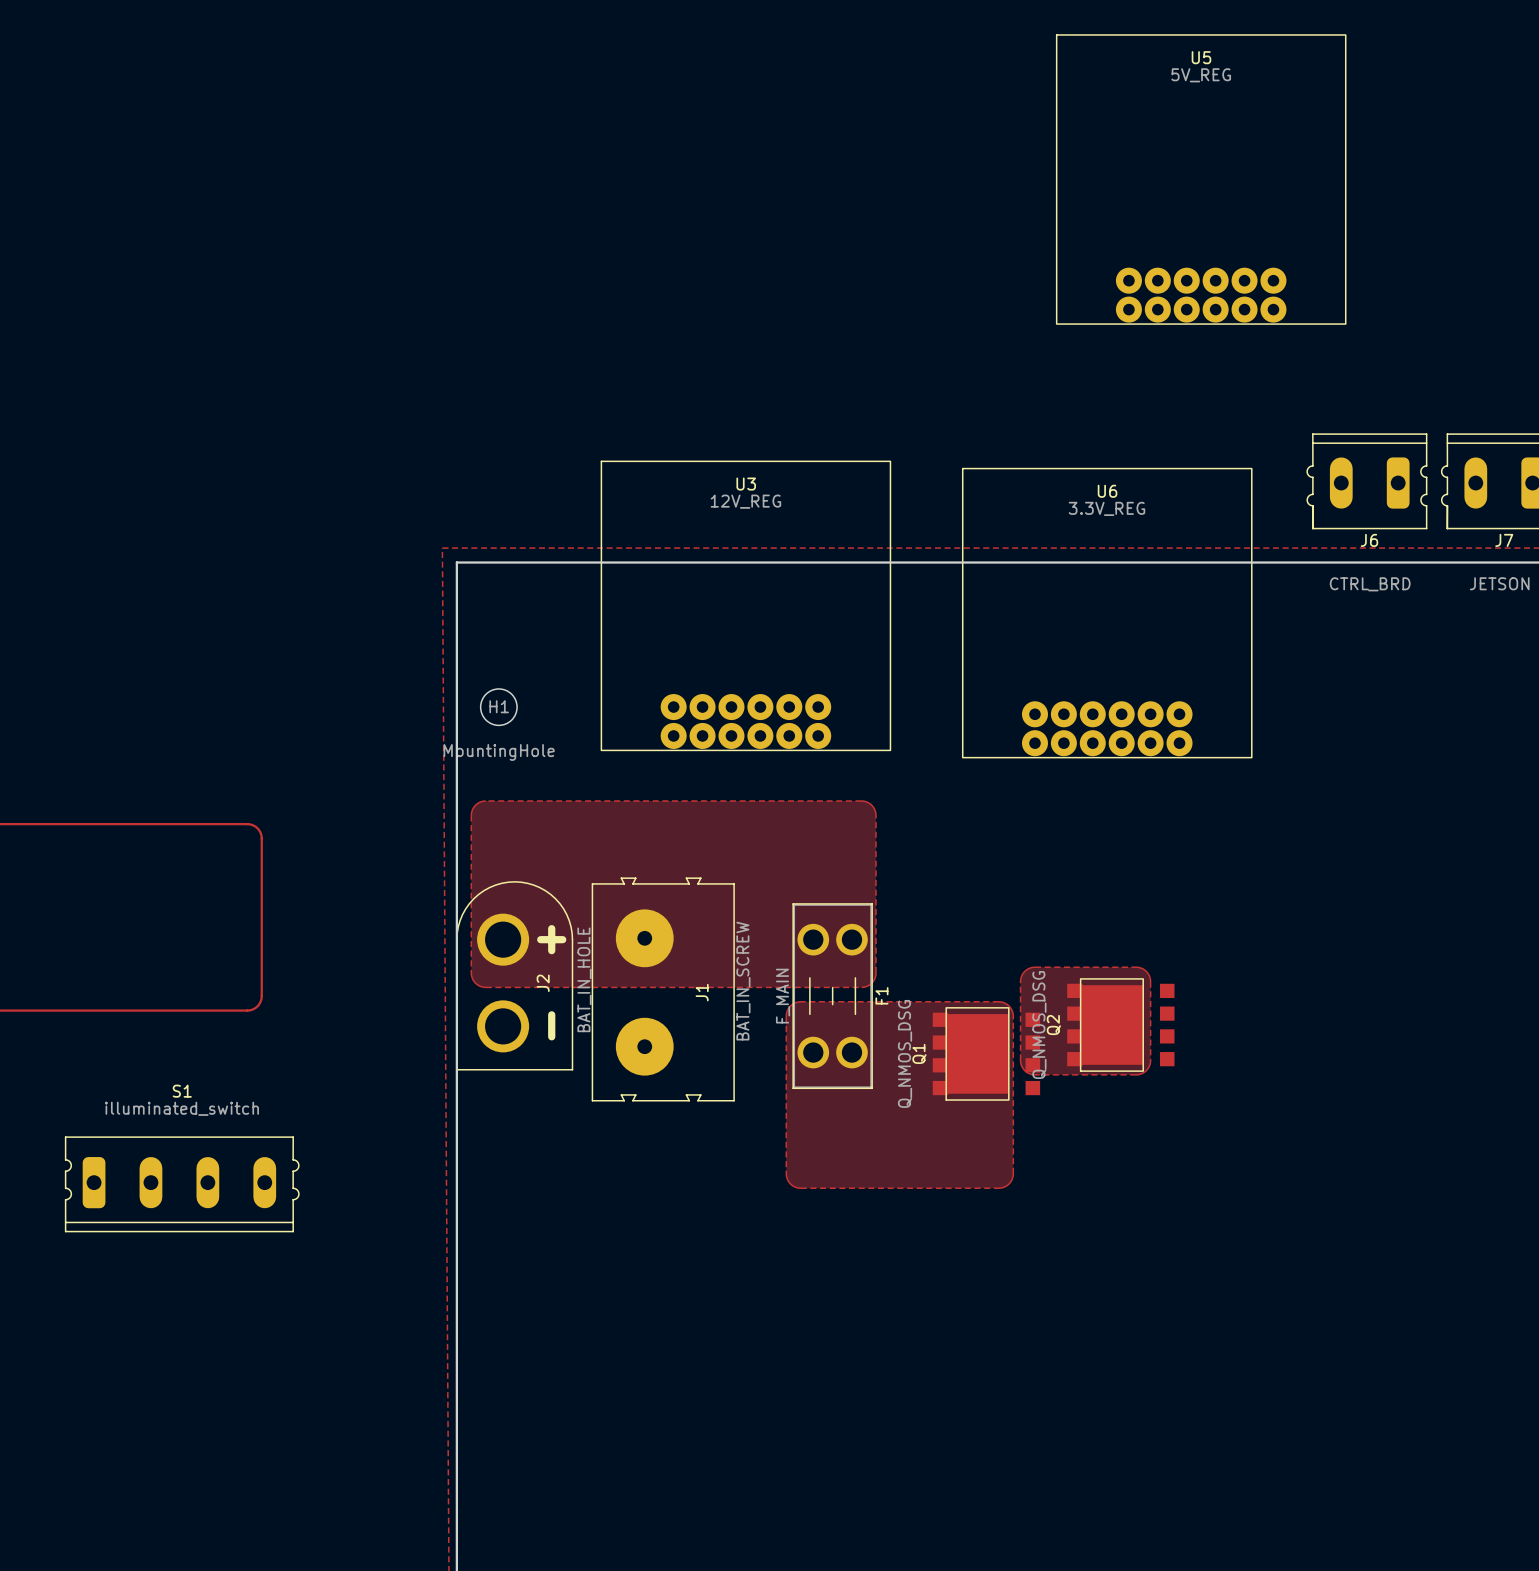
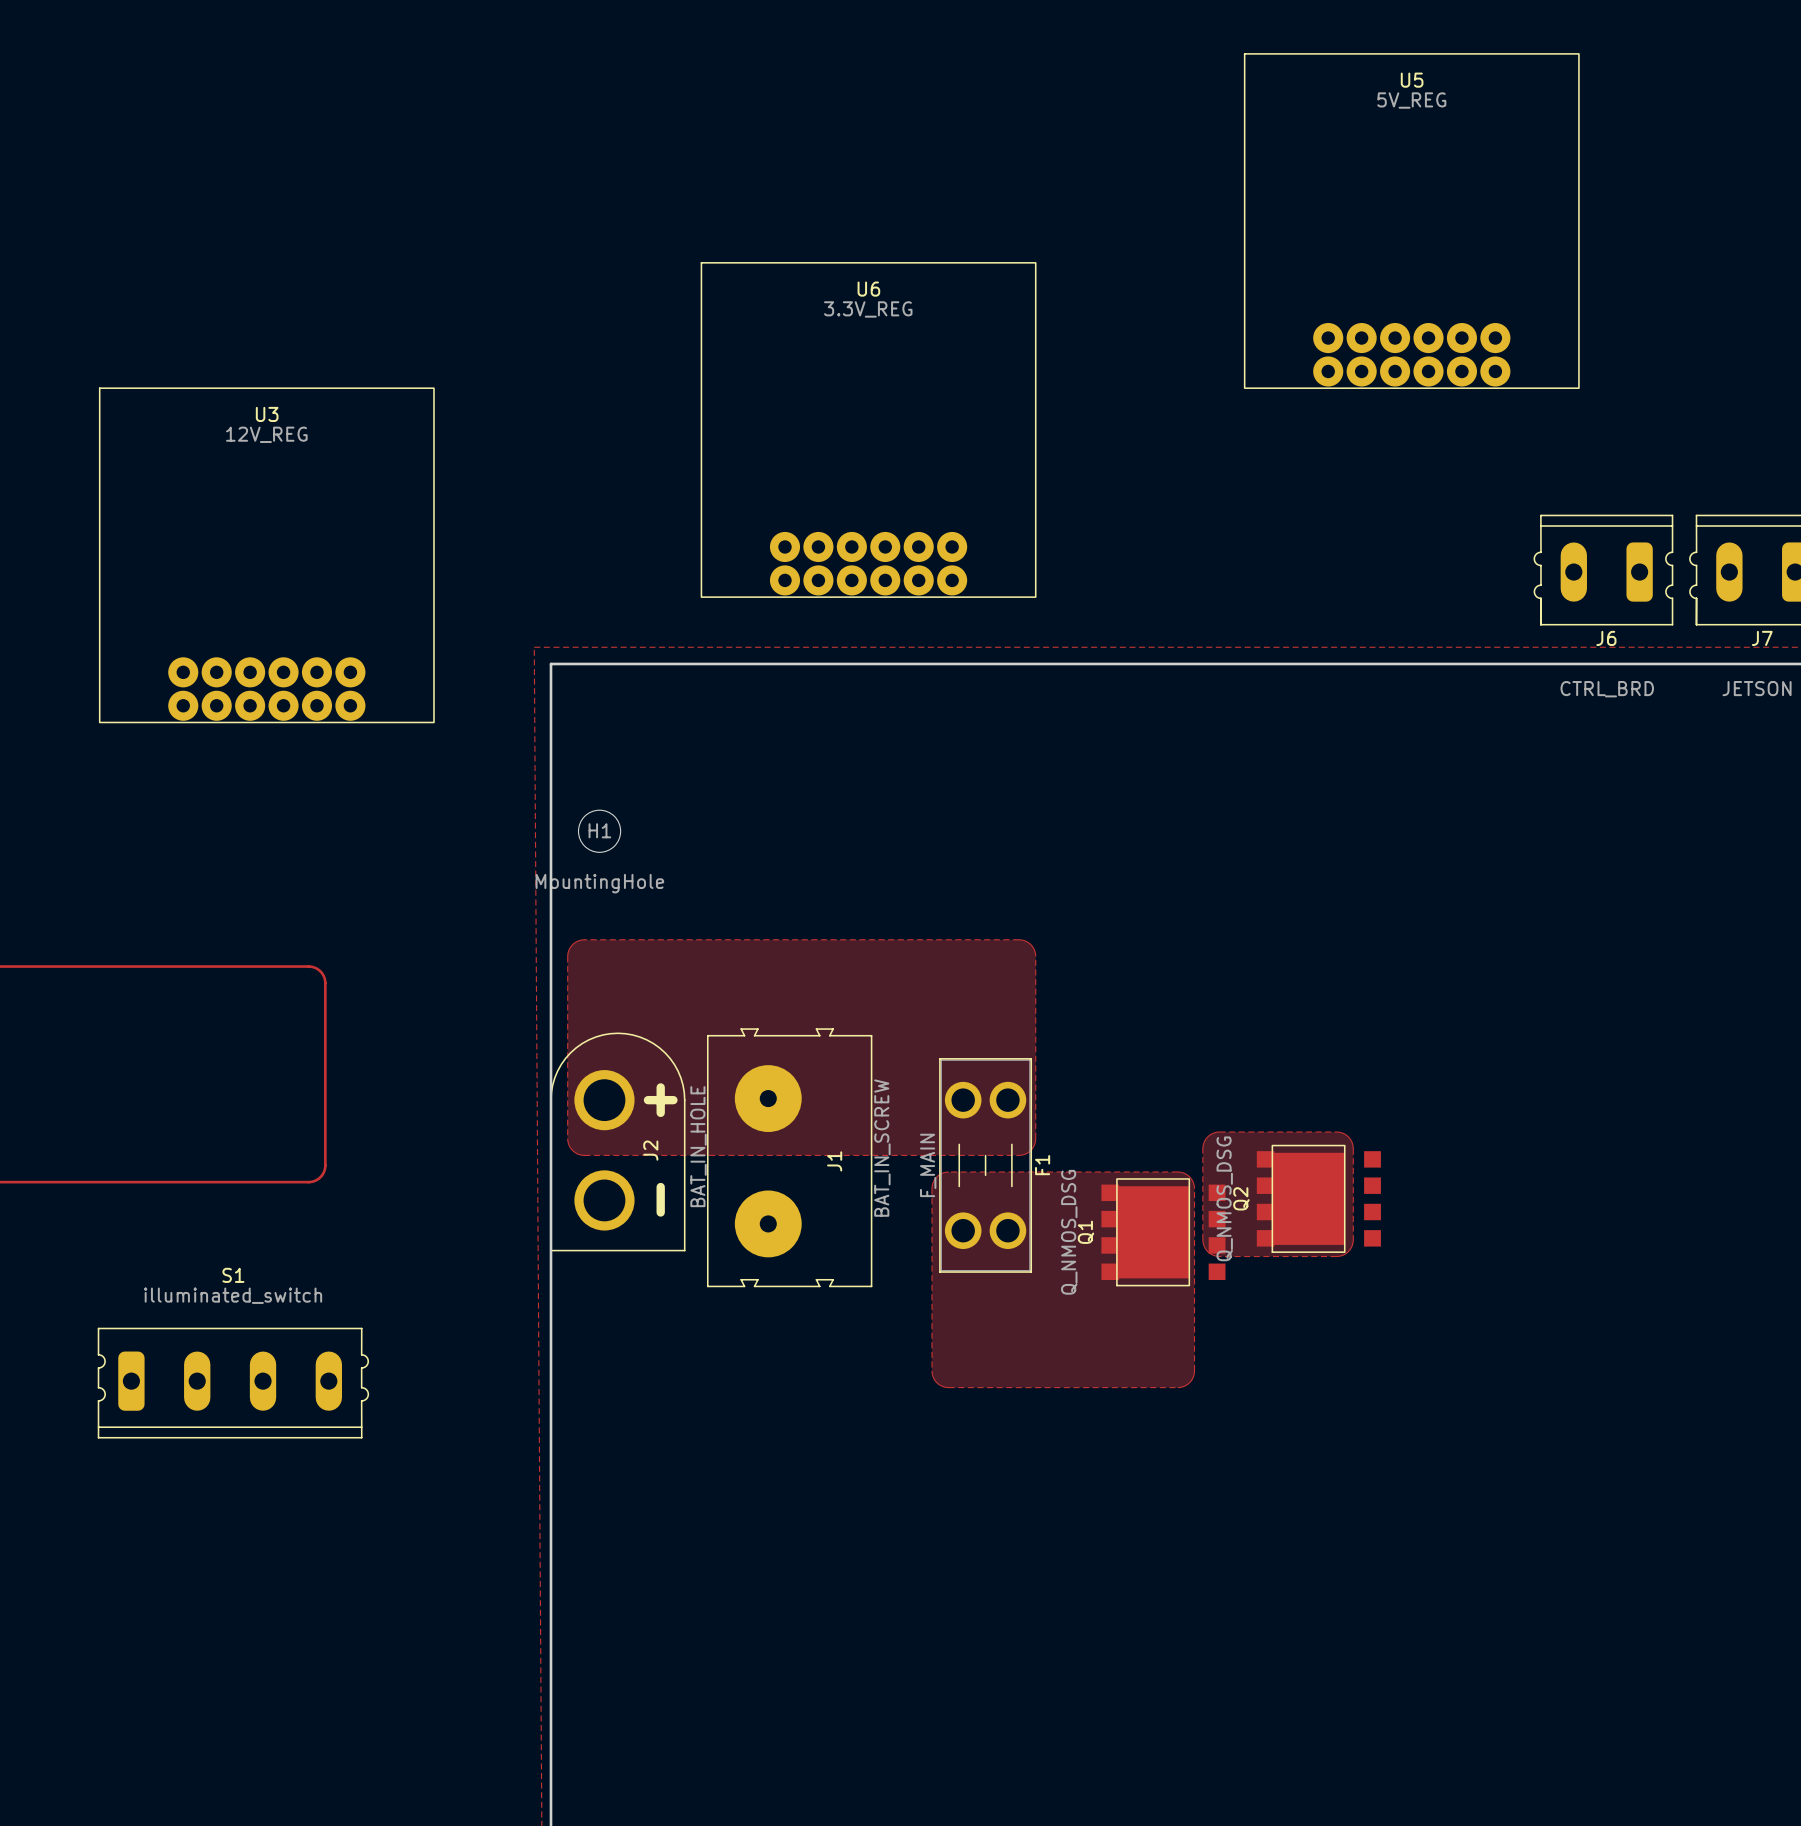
U3 position: (745, 605) -> (266, 555)
U6 position: (1107, 613) -> (868, 429)

